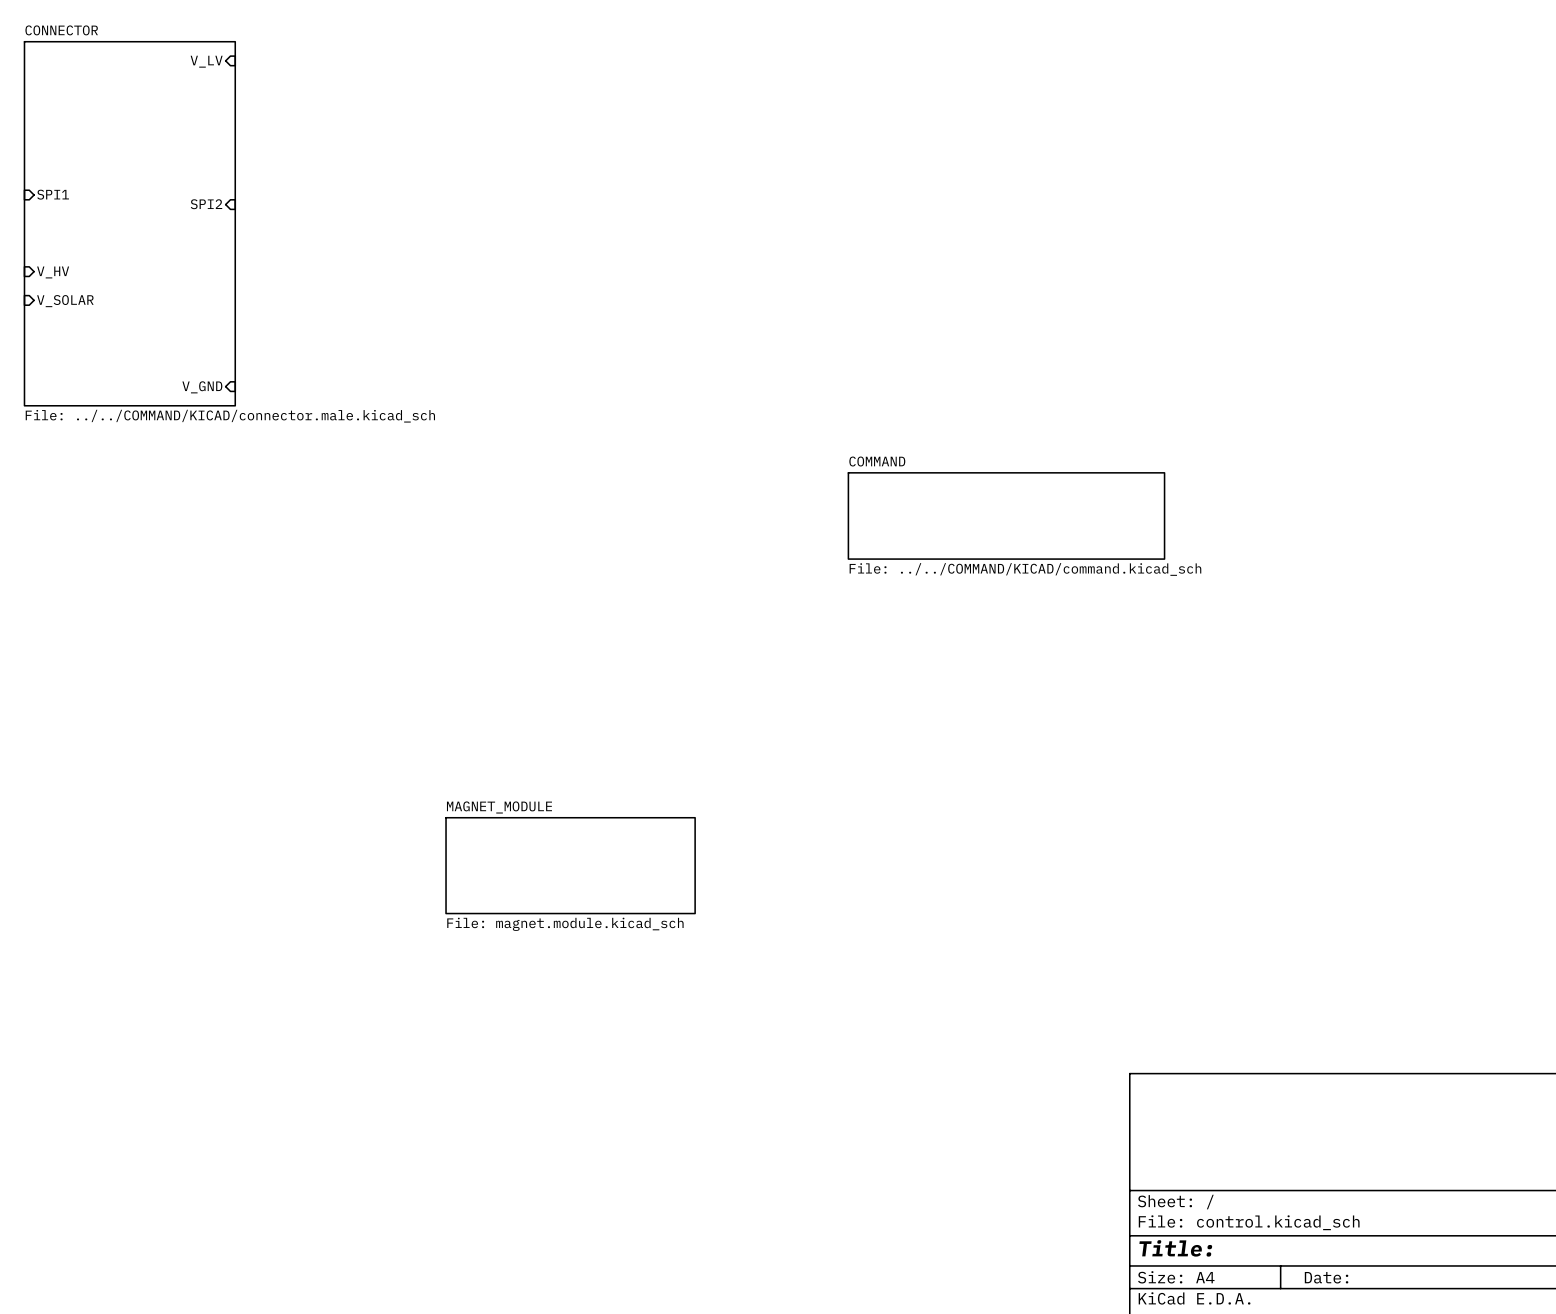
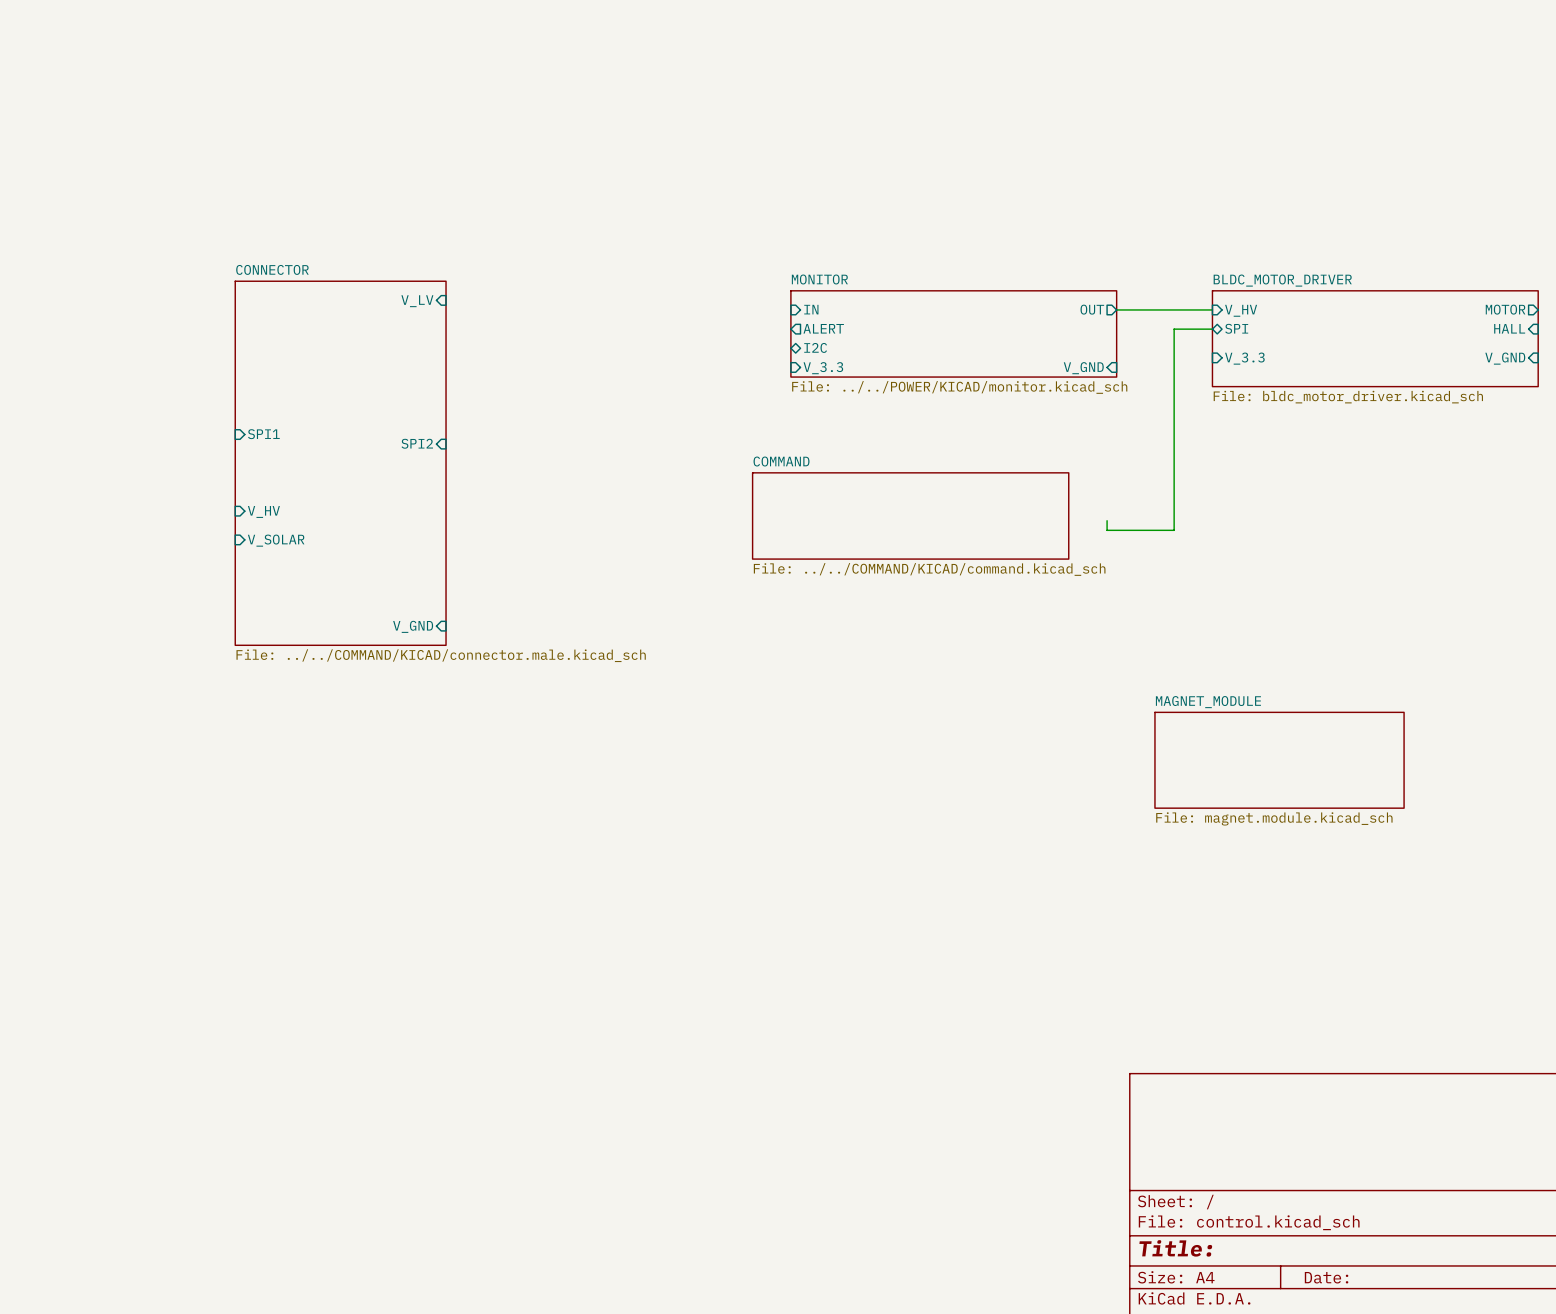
sheet pin: V_LV (206, 61) -> none
sheet pin: SPI1 (53, 194) -> none
sheet pin: SPI2 (206, 204) -> none
sheet CONNECTOR: File: ../../COMMAND/KICAD/connector.male.kicad_sch (129, 223) -> none
sheet pin: V_HV (53, 272) -> none
sheet pin: V_SOLAR (65, 301) -> none
sheet pin: none -> V_LV (417, 301)
sheet pin: none -> IN (811, 309)
sheet pin: none -> OUT (1092, 309)
wire: none -> (1116, 309) (1212, 309)
sheet pin: none -> MOTOR (1505, 309)
sheet pin: none -> V_HV (1241, 310)
sheet pin: none -> ALERT (823, 328)
sheet pin: none -> SPI (1236, 328)
sheet pin: none -> HALL (1509, 328)
wire: none -> (1212, 329) (1174, 329) (1174, 530) (1107, 530) (1107, 520)
sheet MONITOR: none -> File: ../../POWER/KICAD/monitor.kicad_sch (953, 333)
sheet BLDC_MOTOR_DRIVER: none -> File: bldc_motor_driver.kicad_sch (1375, 338)
sheet pin: none -> I2C (815, 347)
sheet pin: none -> V_3.3 (1244, 358)
sheet pin: none -> V_GND (1505, 358)
sheet pin: none -> V_3.3 (823, 368)
sheet pin: none -> V_GND (1083, 368)
sheet pin: V_GND (202, 387) -> none
sheet pin: none -> SPI1 (263, 434)
sheet pin: none -> SPI2 (417, 443)
sheet CONNECTOR: none -> File: ../../COMMAND/KICAD/connector.male.kicad_sch (340, 463)
sheet pin: none -> V_HV (263, 511)
sheet COMMAND position: (1006, 515) -> (910, 515)
sheet pin: none -> V_SOLAR (276, 540)
sheet pin: none -> V_GND (413, 626)
sheet MAGNET_MODULE: none -> File: magnet.module.kicad_sch (1279, 760)
sheet MAGNET_MODULE: File: magnet.module.kicad_sch (570, 865) -> none

